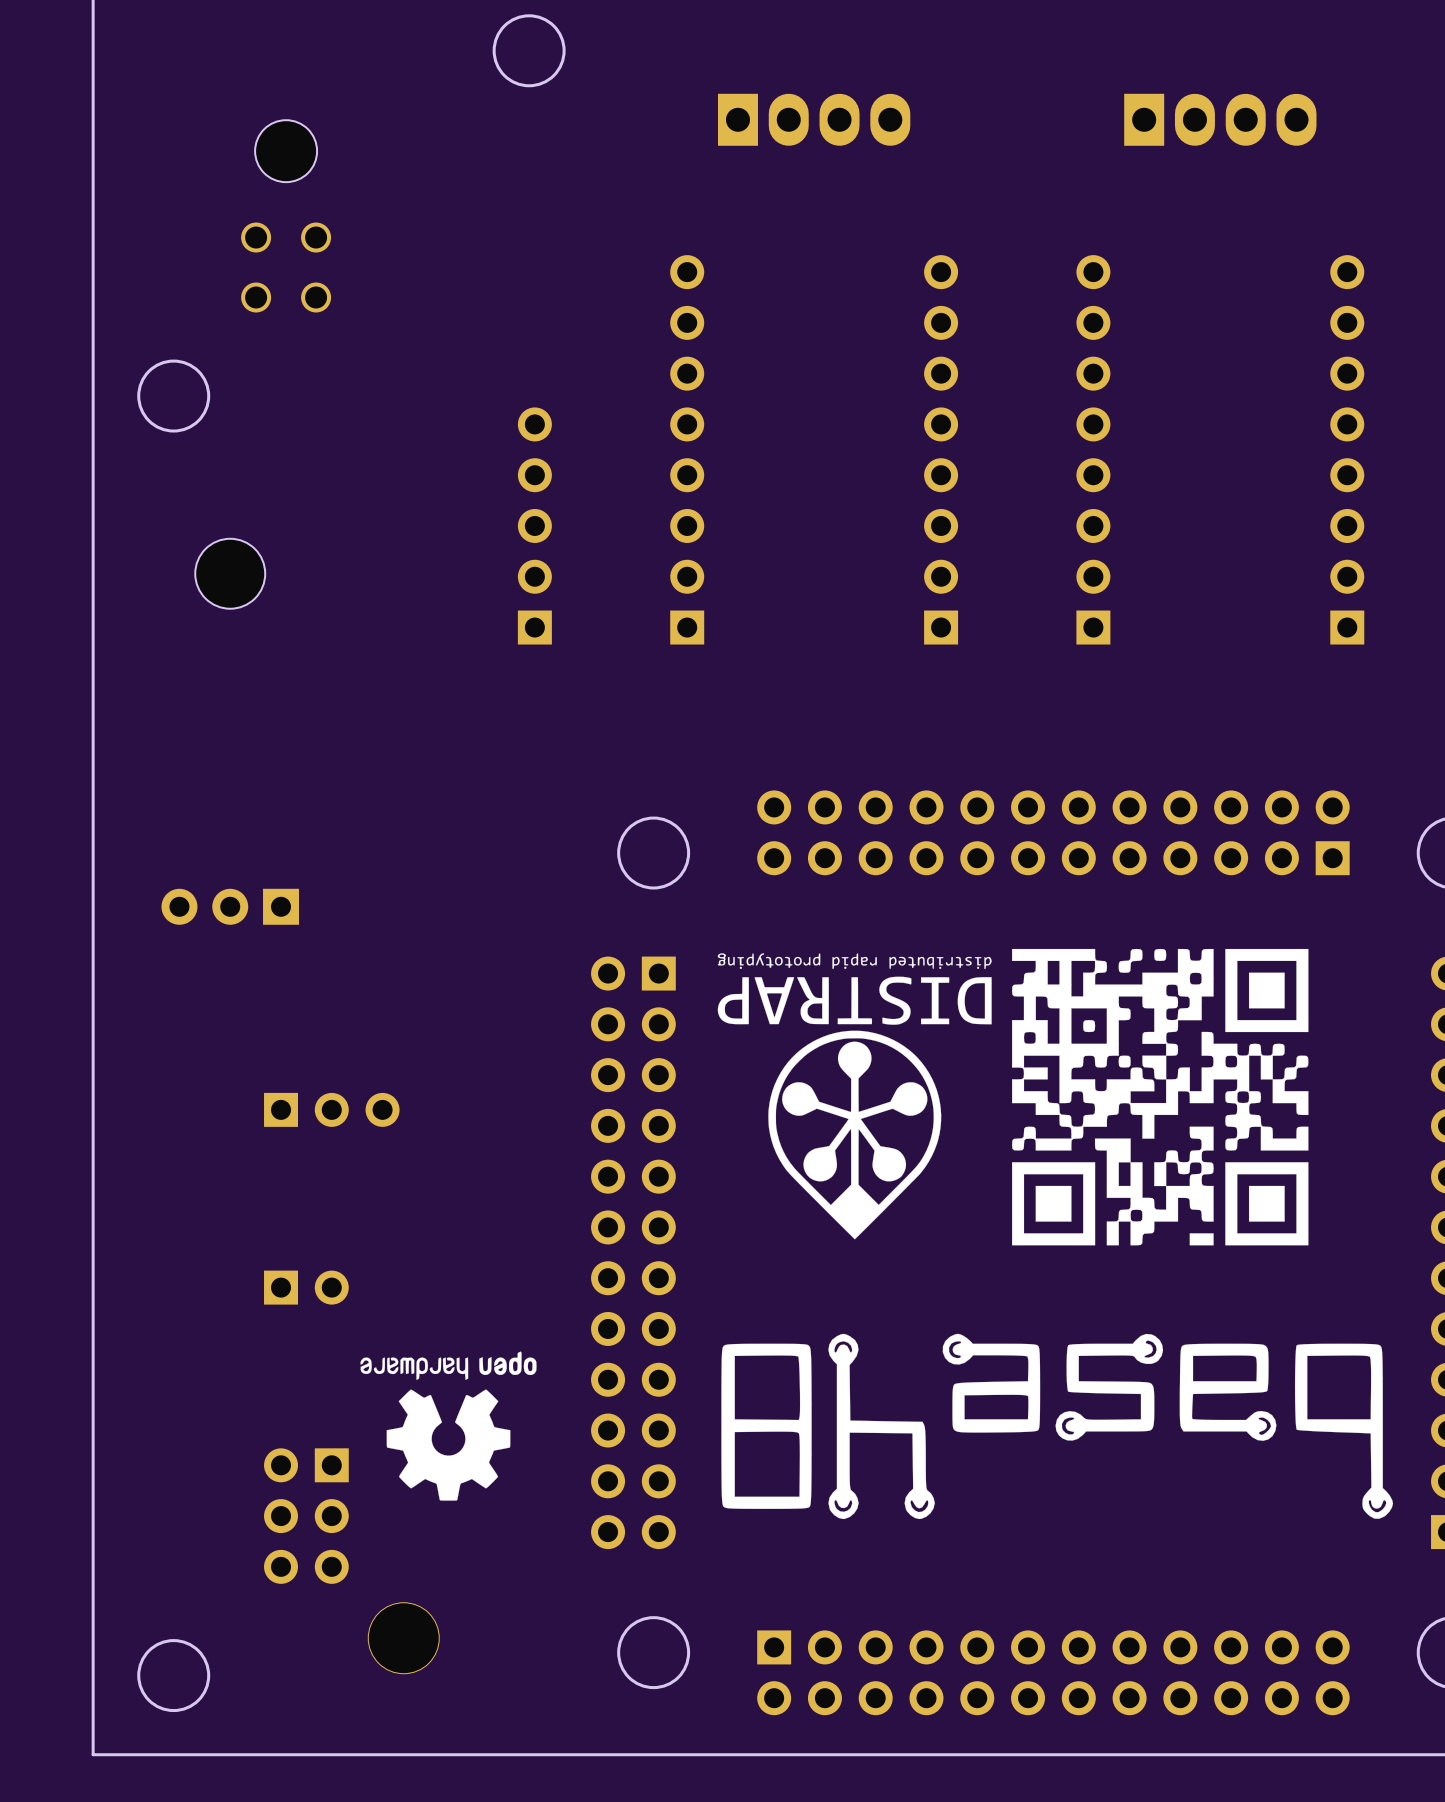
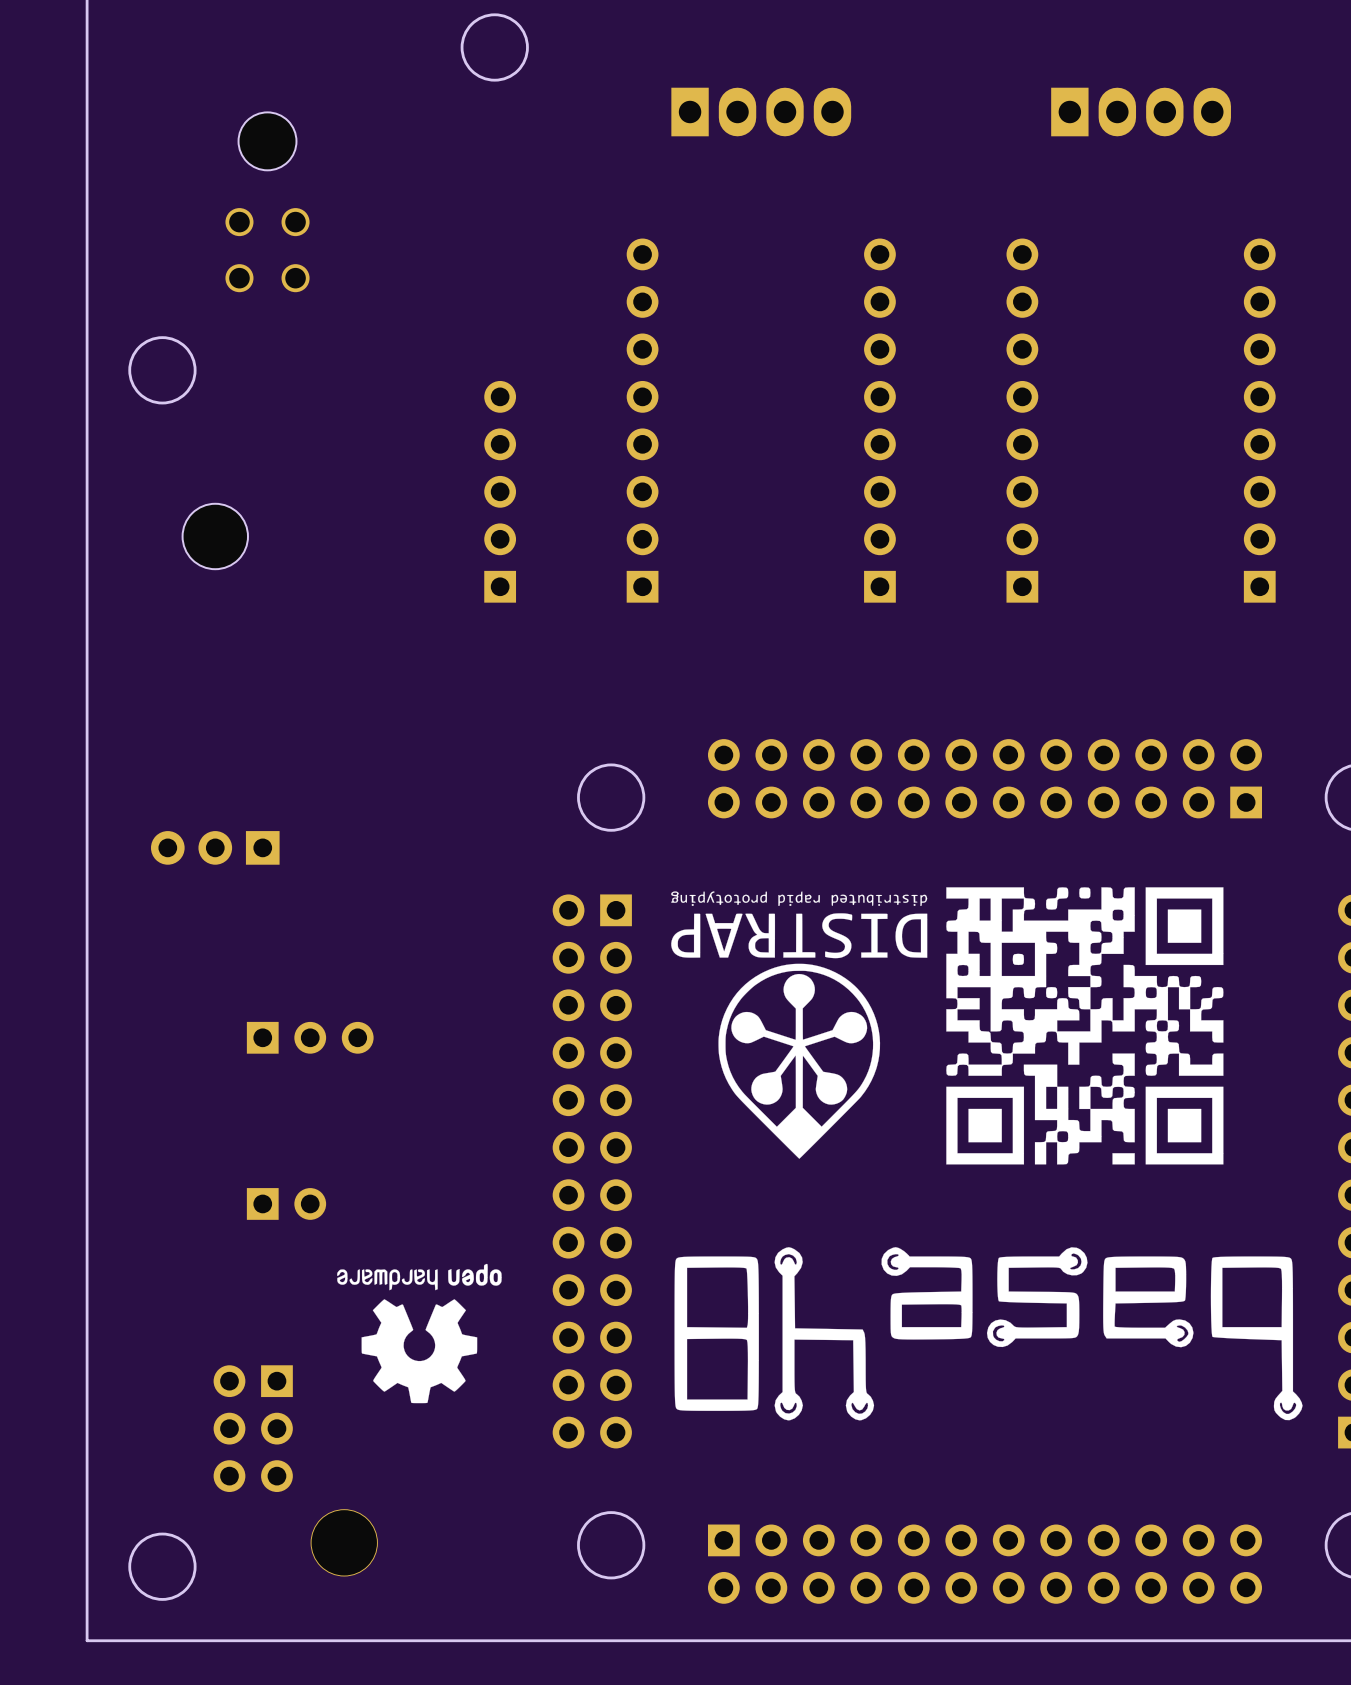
part position: (351, 1561) -> (295, 1470)

